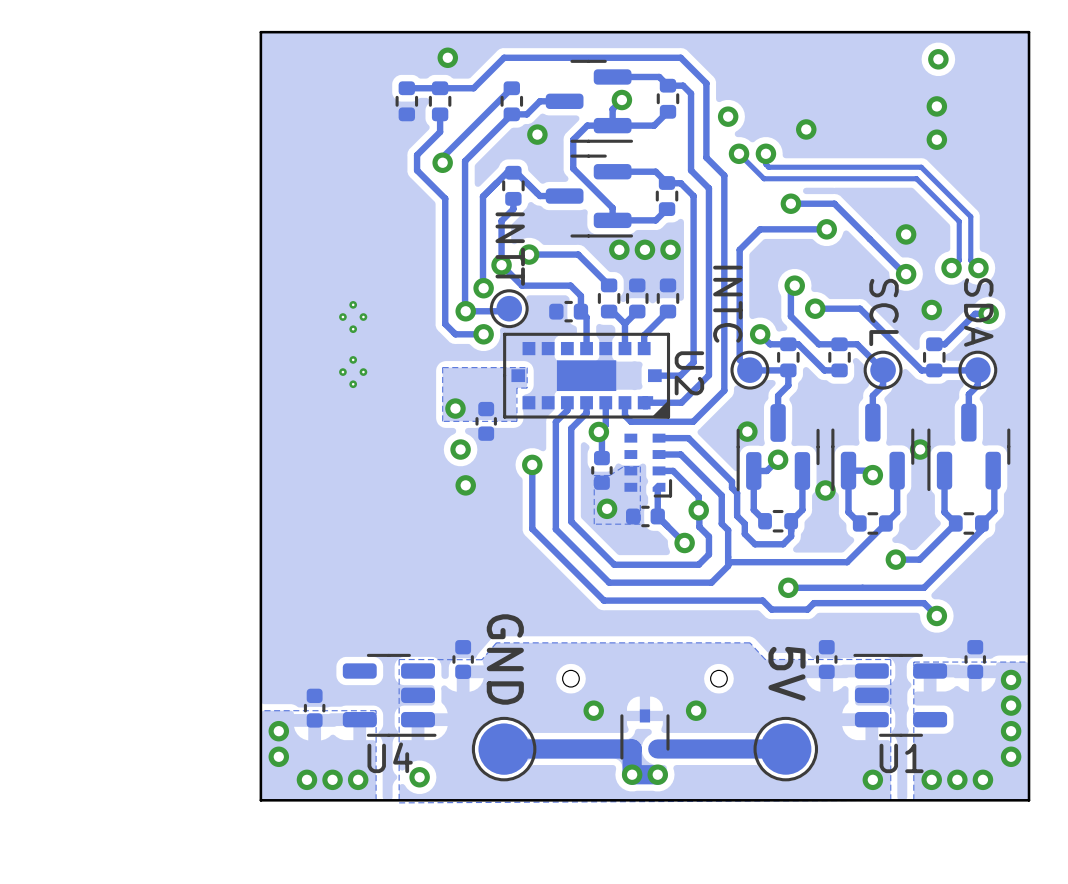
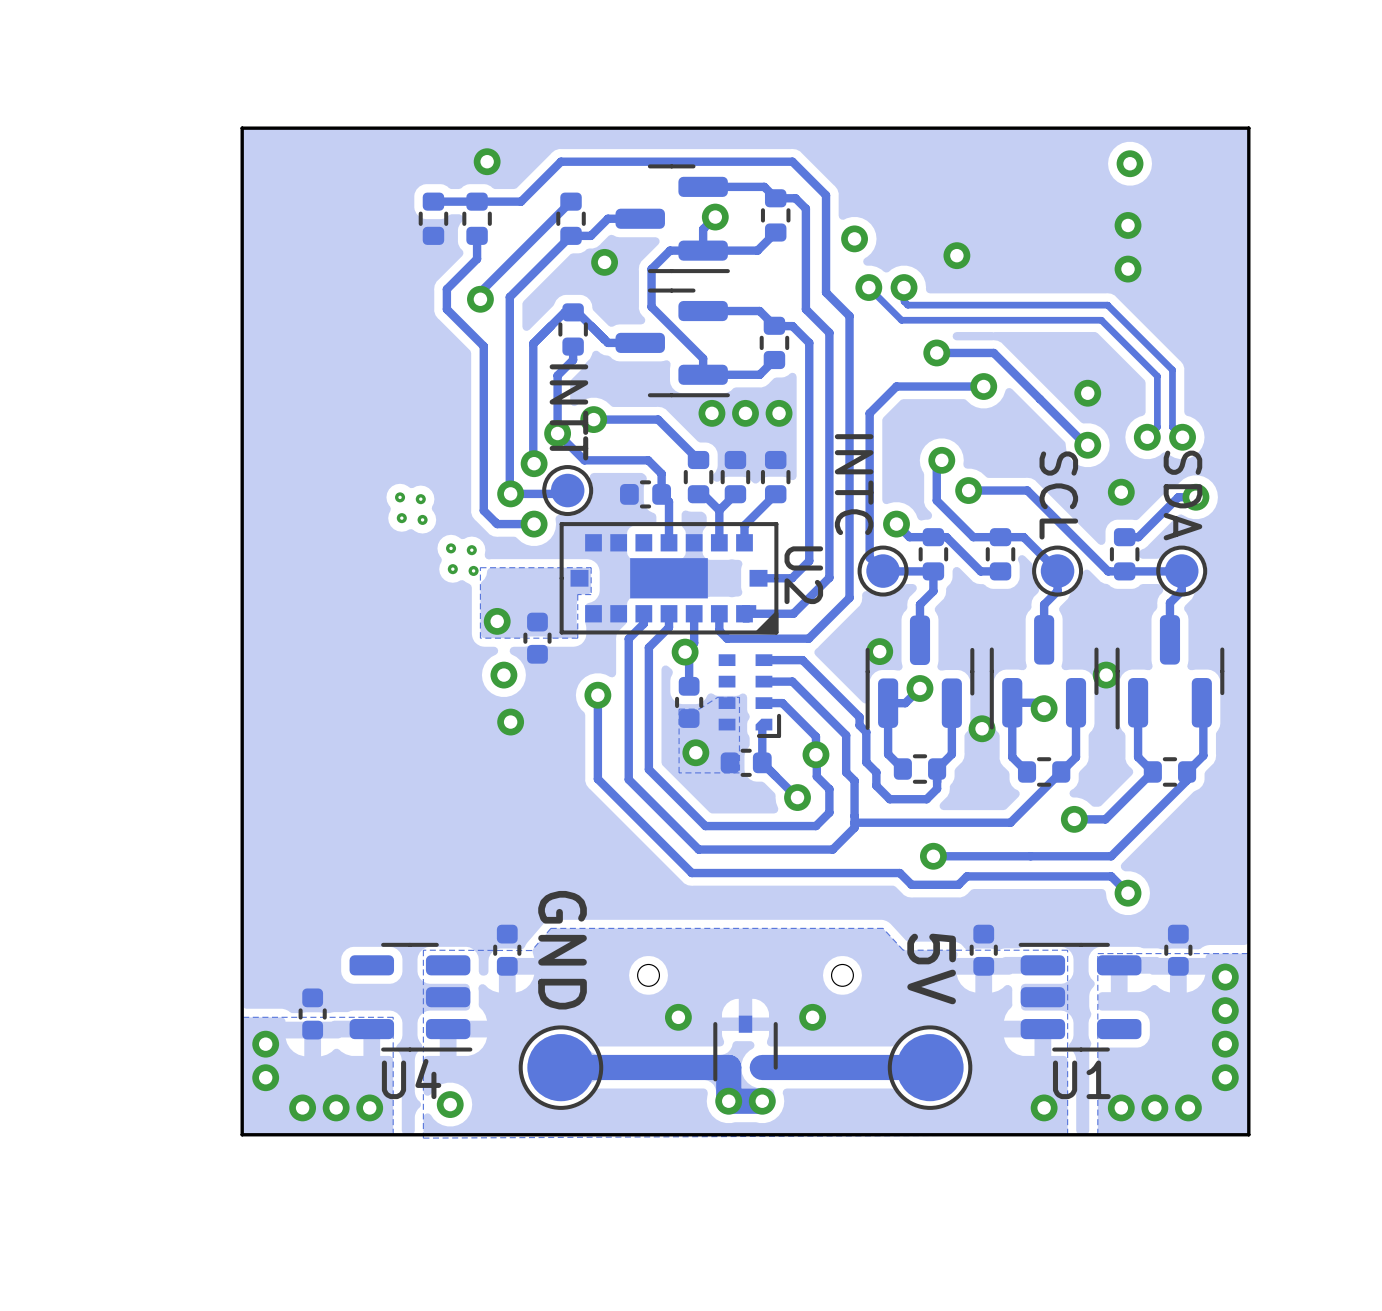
part: none -> (436, 534)
part: (353, 344) -> none

